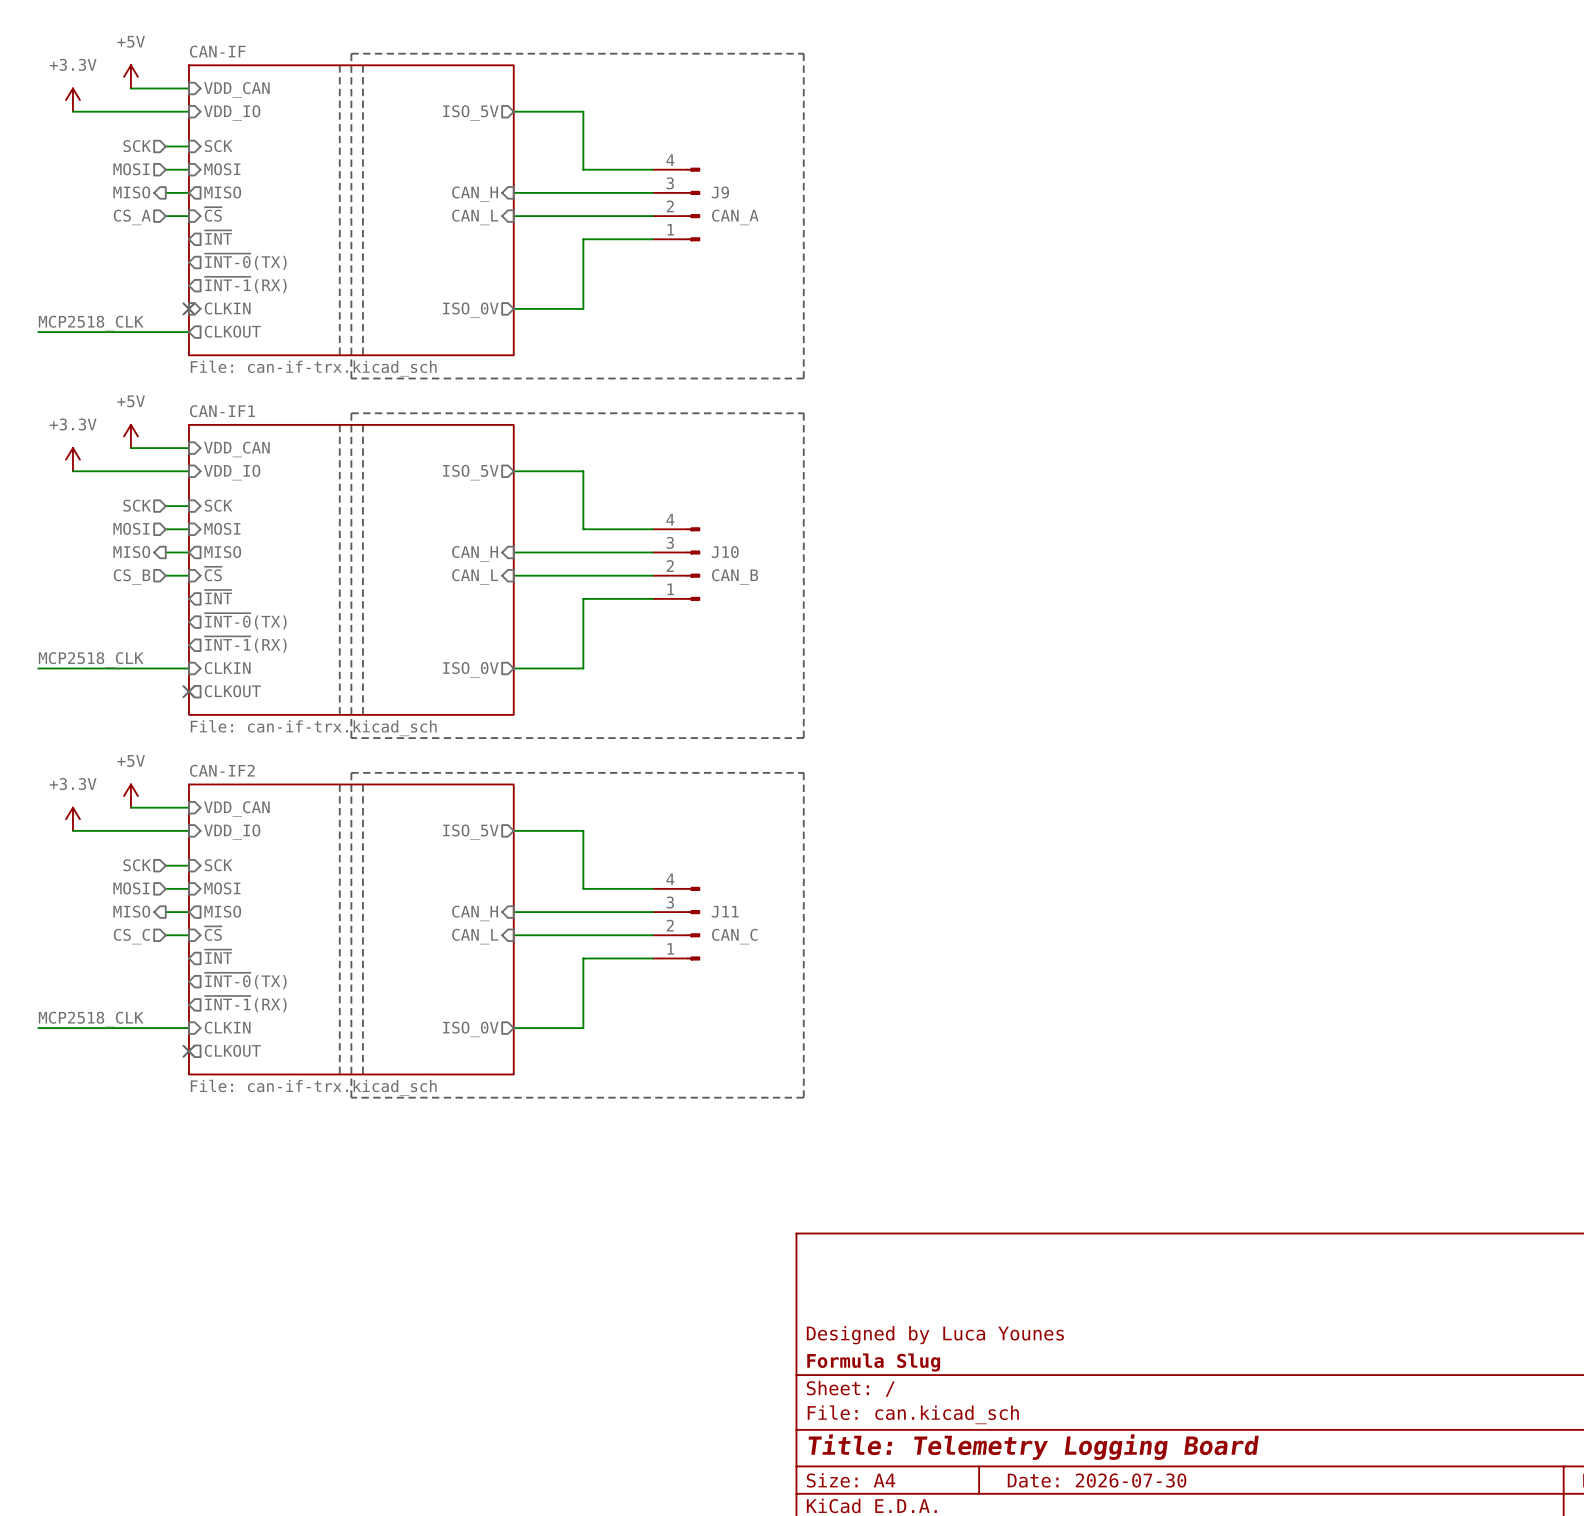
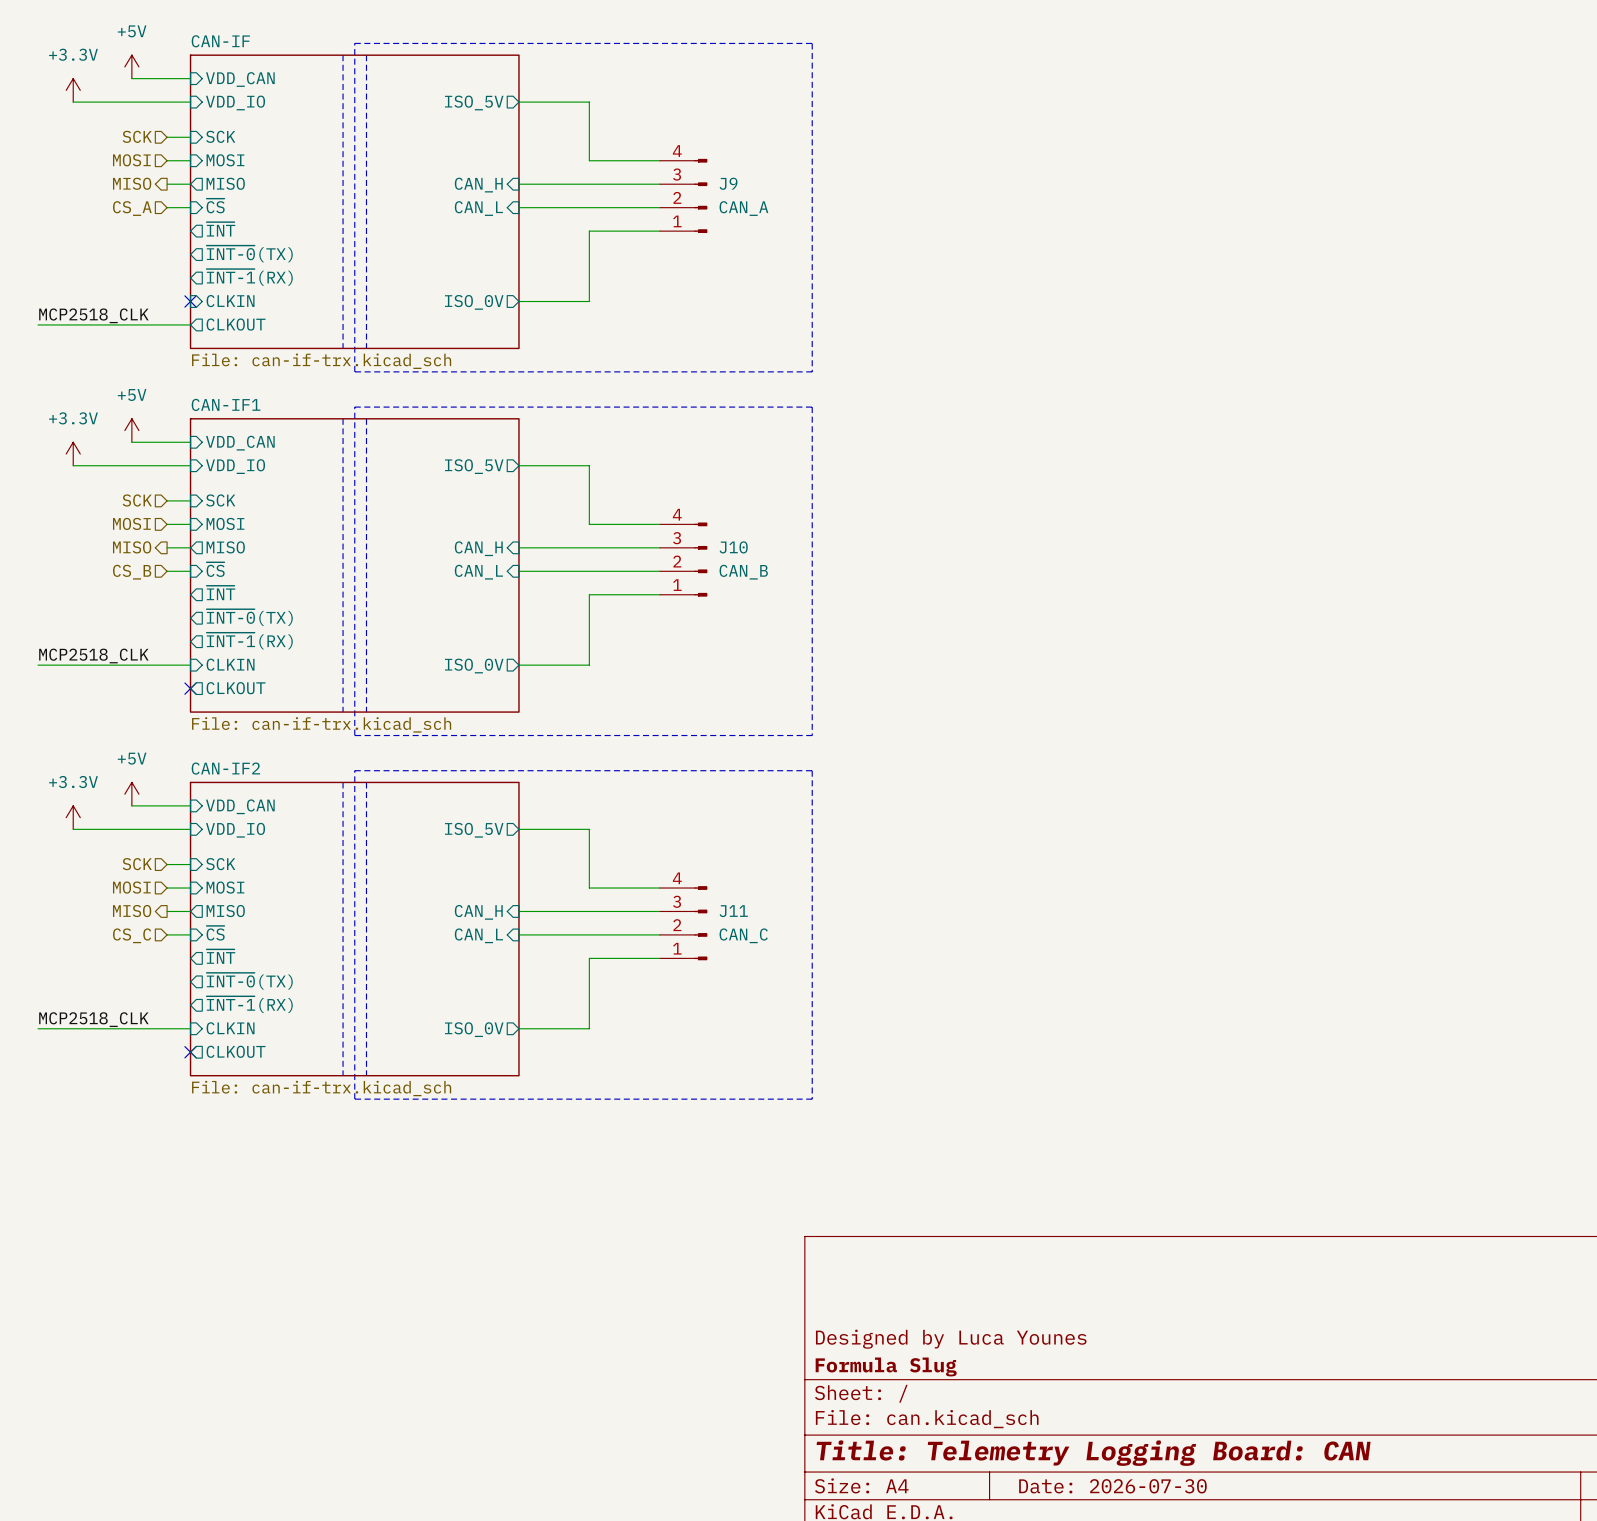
title block: Title: Telemetry Logging Board (1033, 1447) -> Title: Telemetry Logging Board: CAN (1093, 1453)

